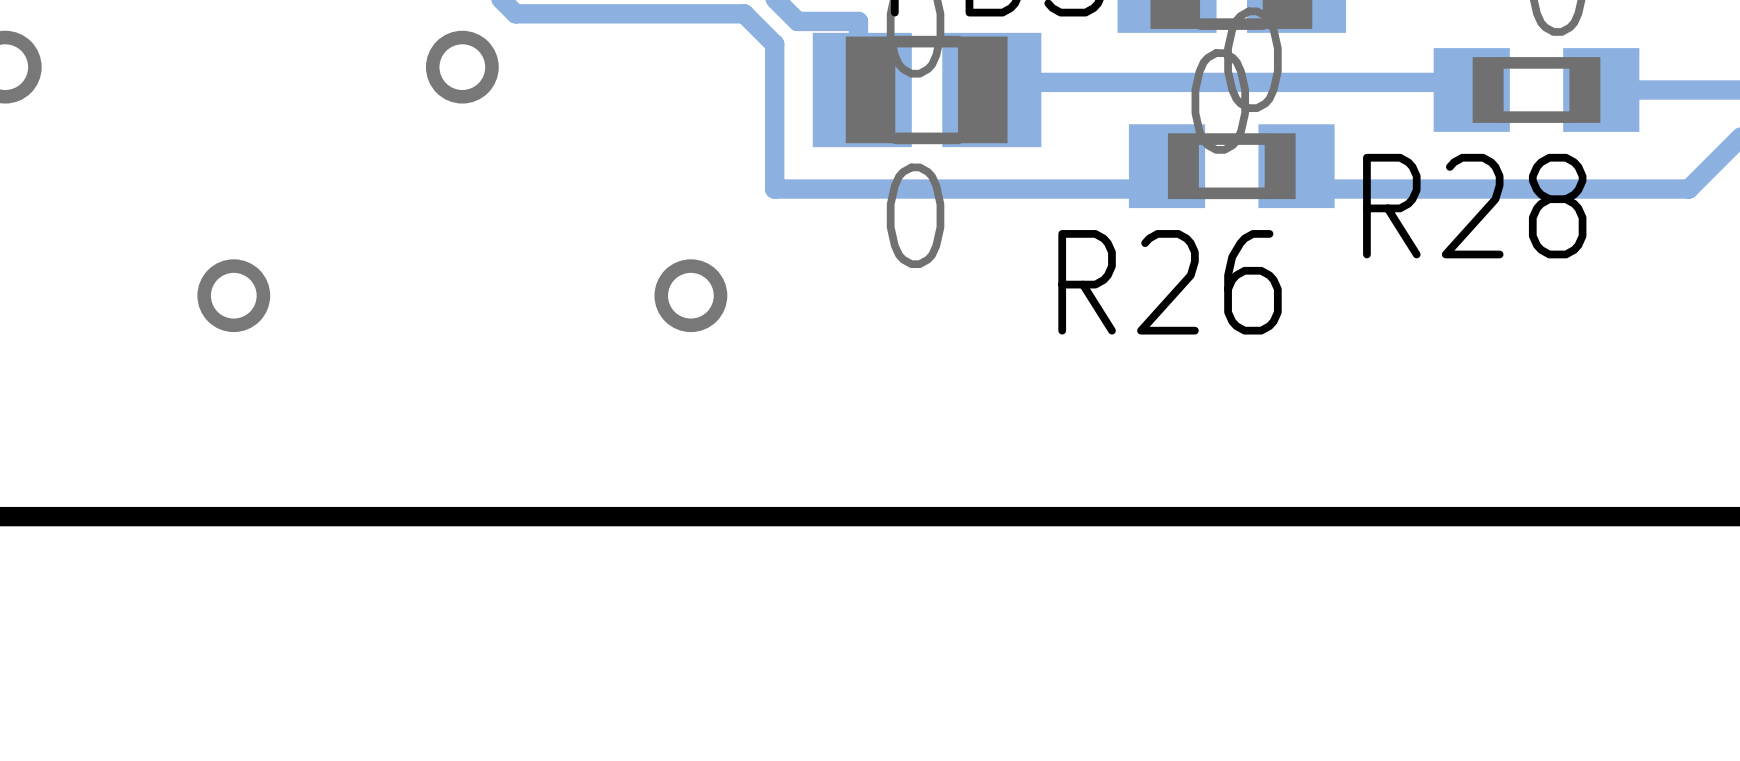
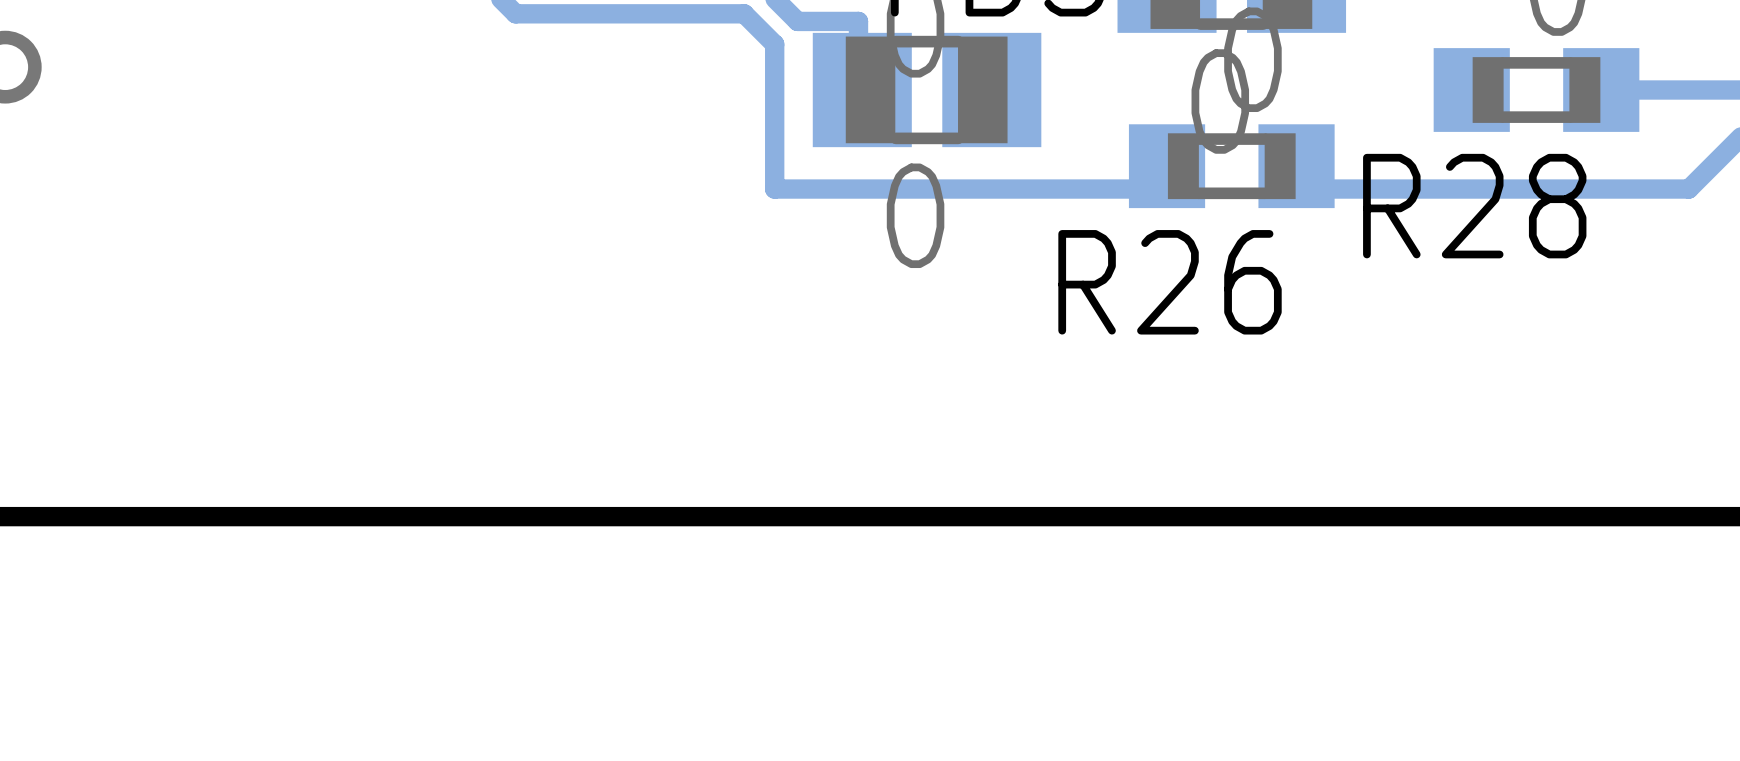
bottom track: (988, 59) (988, 90) (991, 90) (995, 82) (1467, 82) (1475, 90) (1471, 90) -> none
via: (462, 67) -> none
via: (233, 295) -> none
via: (690, 295) -> none

